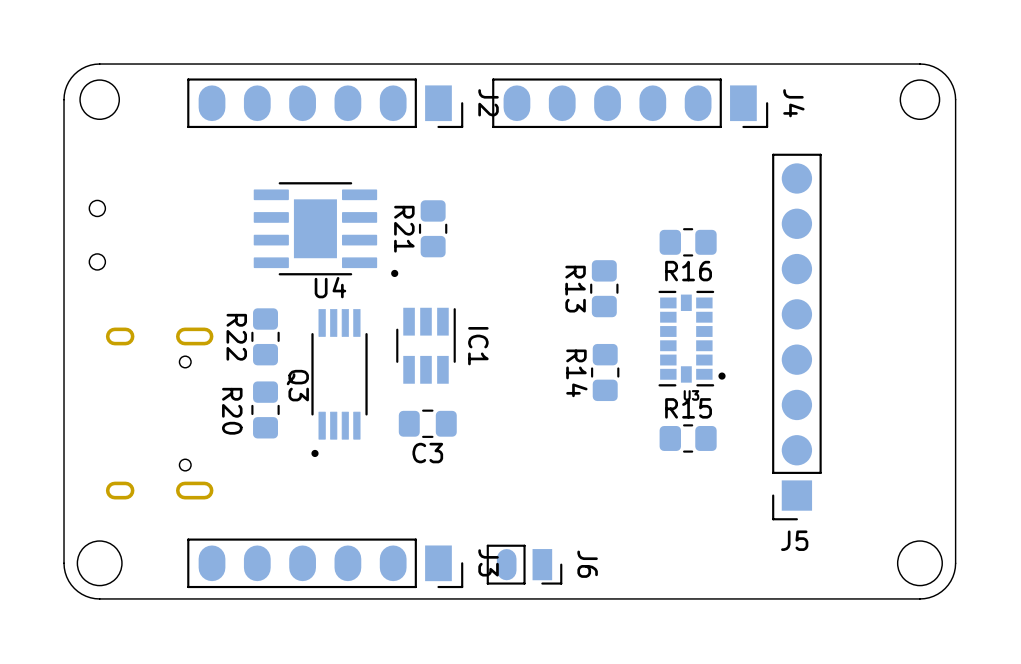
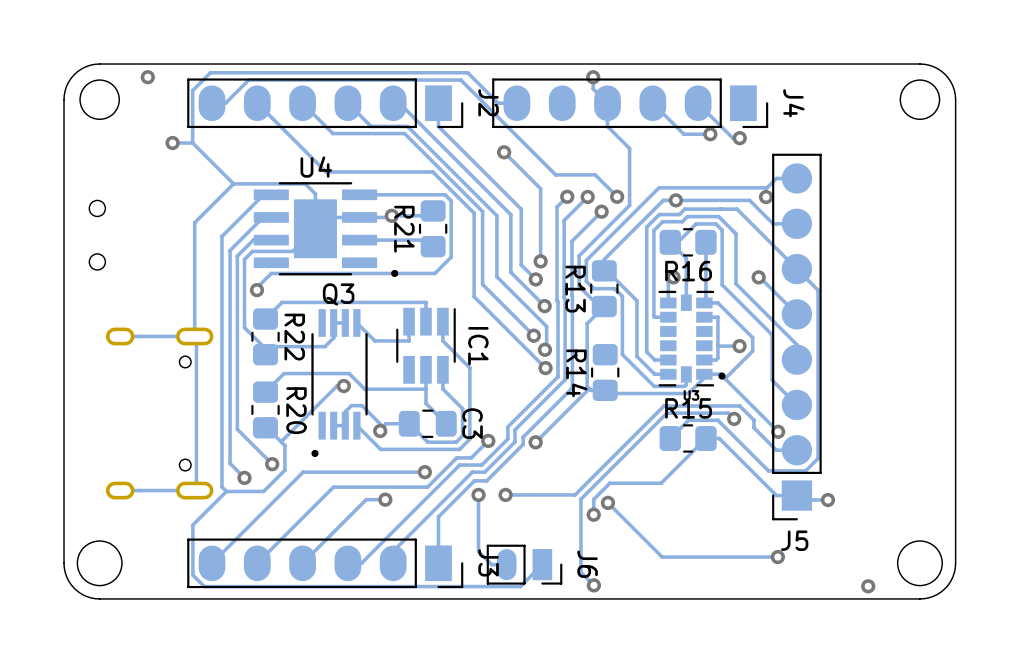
via: none -> (147, 77)
via: none -> (593, 77)
track: none -> (596, 80) (593, 77) (593, 88) (607, 103) (607, 126) (629, 148) (629, 205) (579, 255) (579, 286) (601, 309)
track: none -> (212, 103) (225, 103) (248, 80) (460, 80) (555, 174) (595, 174) (617, 196)
track: none -> (257, 103) (326, 172) (432, 172) (474, 213) (474, 296) (545, 368)
track: none -> (302, 103) (332, 133) (404, 133) (482, 211) (482, 284) (533, 335)
track: none -> (347, 103) (371, 126) (407, 126) (496, 215) (496, 276) (546, 326) (546, 348) (544, 349)
track: none -> (393, 103) (399, 103) (510, 214) (510, 272) (544, 306)
track: none -> (438, 103) (438, 126) (521, 209) (521, 264) (535, 279)
track: none -> (516, 103) (498, 103) (467, 72) (210, 72) (192, 90) (192, 143)
track: none -> (652, 103) (683, 134) (710, 134)
track: none -> (698, 103) (732, 138) (739, 138)
via: none -> (710, 134)
via: none -> (739, 138)
via: none -> (172, 143)
track: none -> (192, 143) (233, 183)
track: none -> (192, 143) (172, 143)
track: none -> (504, 152) (540, 188) (540, 261)
via: none -> (504, 152)
track: none -> (796, 178) (776, 178) (767, 187) (658, 187) (586, 260) (586, 281) (593, 288) (614, 288) (622, 296) (622, 354) (654, 386) (684, 386) (686, 374)
track: none -> (233, 183) (305, 183) (315, 193) (315, 228) (326, 239) (328, 239)
track: none -> (233, 183) (194, 222) (194, 336)
track: none -> (271, 194) (263, 194) (221, 236) (221, 487) (226, 491)
track: none -> (359, 194) (445, 194) (451, 200) (451, 257) (434, 273) (271, 273) (256, 287) (256, 290)
track: none -> (567, 196) (557, 206) (558, 376) (507, 426) (507, 439) (481, 465) (459, 465) (361, 563) (347, 563)
via: none -> (567, 196)
track: none -> (587, 196) (564, 220) (565, 379) (515, 429) (515, 441) (484, 472) (472, 472) (393, 551) (393, 563)
via: none -> (587, 196)
via: none -> (617, 196)
via: none -> (766, 197)
via: none -> (675, 200)
track: none -> (433, 210) (428, 215) (326, 217) (292, 251) (252, 251) (244, 259) (244, 327) (263, 346) (324, 346) (333, 337) (333, 322) (345, 322)
track: none -> (601, 211) (571, 241) (572, 387) (523, 437) (523, 444) (486, 480) (474, 480) (438, 516) (438, 563)
via: none -> (601, 211)
via: none -> (391, 215)
track: none -> (271, 217) (263, 217) (230, 250) (230, 463) (244, 477)
track: none -> (796, 223) (773, 223) (749, 200) (663, 200) (604, 259) (604, 270) (607, 270) (636, 300) (636, 356) (654, 374) (668, 374)
track: none -> (271, 240) (253, 240) (237, 256) (237, 429) (272, 464)
track: none -> (359, 240) (426, 240) (433, 246)
track: none -> (670, 242) (686, 258) (686, 302)
track: none -> (705, 242) (705, 297) (711, 302)
track: none -> (674, 246) (696, 223) (715, 223) (722, 230) (722, 284) (772, 334) (772, 380) (796, 404)
via: none -> (540, 261)
track: none -> (673, 277) (668, 282) (668, 302)
via: none -> (673, 277)
track: none -> (758, 277) (796, 314)
via: none -> (758, 277)
via: none -> (535, 279)
U4 name position: U4 (330, 287) -> U4 (316, 167)
via: none -> (256, 290)
track: none -> (704, 302) (717, 302) (752, 337) (752, 351) (725, 378)
via: none -> (544, 306)
track: none -> (601, 309) (587, 323) (587, 386) (590, 390) (605, 390) (608, 393) (688, 393) (704, 377) (704, 374) (720, 374) (778, 431)
track: none -> (668, 317) (653, 316) (653, 230) (662, 221) (682, 221) (687, 216) (718, 216) (736, 233) (736, 283) (796, 344) (796, 359)
track: none -> (704, 317) (717, 317) (717, 358) (716, 360) (704, 360)
track: none -> (265, 319) (282, 302) (426, 302) (426, 321)
track: none -> (409, 321) (409, 340) (374, 340) (356, 322)
track: none -> (442, 321) (442, 340) (469, 367) (469, 439) (459, 449) (380, 449) (356, 425)
via: none -> (533, 335)
track: none -> (194, 336) (120, 336)
track: none -> (194, 336) (196, 338) (196, 488) (194, 490) (120, 490)
R22 name position: R22 (236, 337) -> R22 (294, 337)
track: none -> (739, 346) (717, 346)
via: none -> (739, 346)
via: none -> (544, 349)
track: none -> (668, 360) (654, 360) (646, 351) (646, 227) (659, 214) (679, 214) (684, 209) (736, 209) (818, 290) (818, 458) (805, 470) (768, 470) (717, 420) (688, 420) (670, 438)
via: none -> (545, 368)
track: none -> (426, 369) (426, 403) (446, 423)
track: none -> (442, 369) (442, 389) (462, 408) (462, 435) (456, 442) (427, 442) (409, 423) (385, 423) (380, 431)
Q3 name rotation: 0° (297, 385) -> 90° counterclockwise (338, 294)
Q3 name position: Q3 (297, 385) -> Q3 (338, 294)
track: none -> (343, 386) (336, 386) (281, 441)
via: none -> (343, 386)
track: none -> (589, 388) (535, 442)
track: none -> (426, 389) (364, 389) (349, 373) (284, 373) (265, 392)
R20 name position: R20 (232, 411) -> R20 (296, 410)
track: none -> (734, 418) (728, 413) (666, 413) (580, 499) (580, 572) (593, 585)
via: none -> (734, 418)
track: none -> (333, 425) (345, 425) (345, 411) (351, 405) (361, 405) (382, 426)
track: none -> (265, 427) (284, 445) (284, 470) (263, 491) (226, 491)
via: none -> (380, 431)
via: none -> (778, 431)
track: none -> (488, 440) (471, 457) (456, 457) (427, 487) (333, 487) (257, 563)
via: none -> (488, 440)
via: none -> (535, 442)
track: none -> (796, 450) (776, 450) (753, 427) (753, 420) (739, 406) (663, 406) (575, 494) (505, 494)
C3 name rotation: 0° (427, 453) -> 90° clockwise (472, 423)
C3 name position: C3 (427, 453) -> C3 (472, 423)
via: none -> (272, 464)
track: none -> (424, 472) (303, 472) (212, 563)
via: none -> (424, 472)
via: none -> (244, 477)
track: none -> (226, 491) (192, 525) (192, 575) (204, 586) (520, 586) (542, 564)
track: none -> (478, 494) (478, 551) (491, 564) (506, 564)
via: none -> (478, 494)
via: none -> (505, 494)
track: none -> (385, 499) (366, 499) (302, 563)
via: none -> (385, 499)
track: none -> (827, 500) (801, 500) (796, 495) (776, 495) (719, 438) (705, 438) (661, 483) (609, 483) (593, 499) (593, 514)
via: none -> (827, 500)
track: none -> (607, 502) (662, 557) (777, 557)
via: none -> (607, 502)
via: none -> (593, 514)
via: none -> (777, 557)
via: none -> (593, 585)
via: none -> (868, 586)

